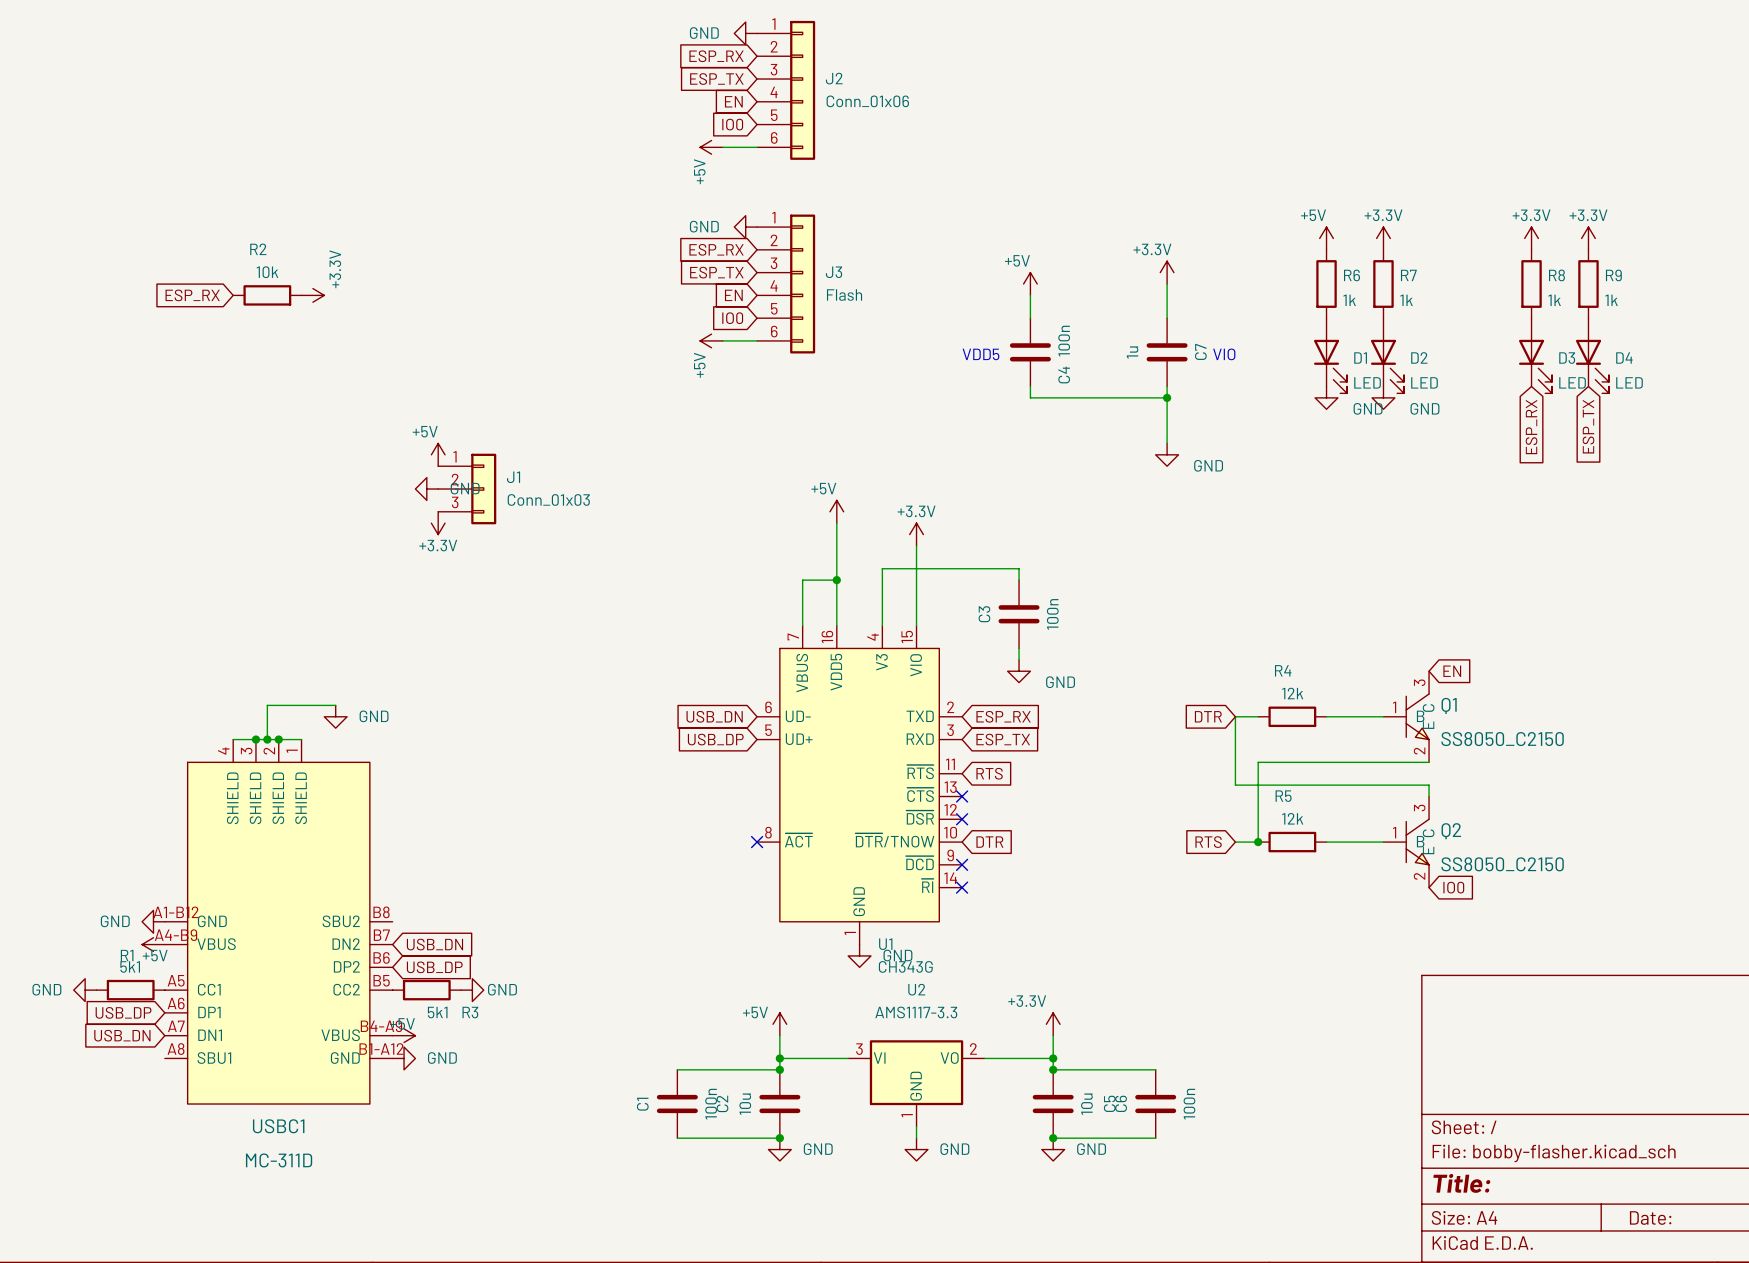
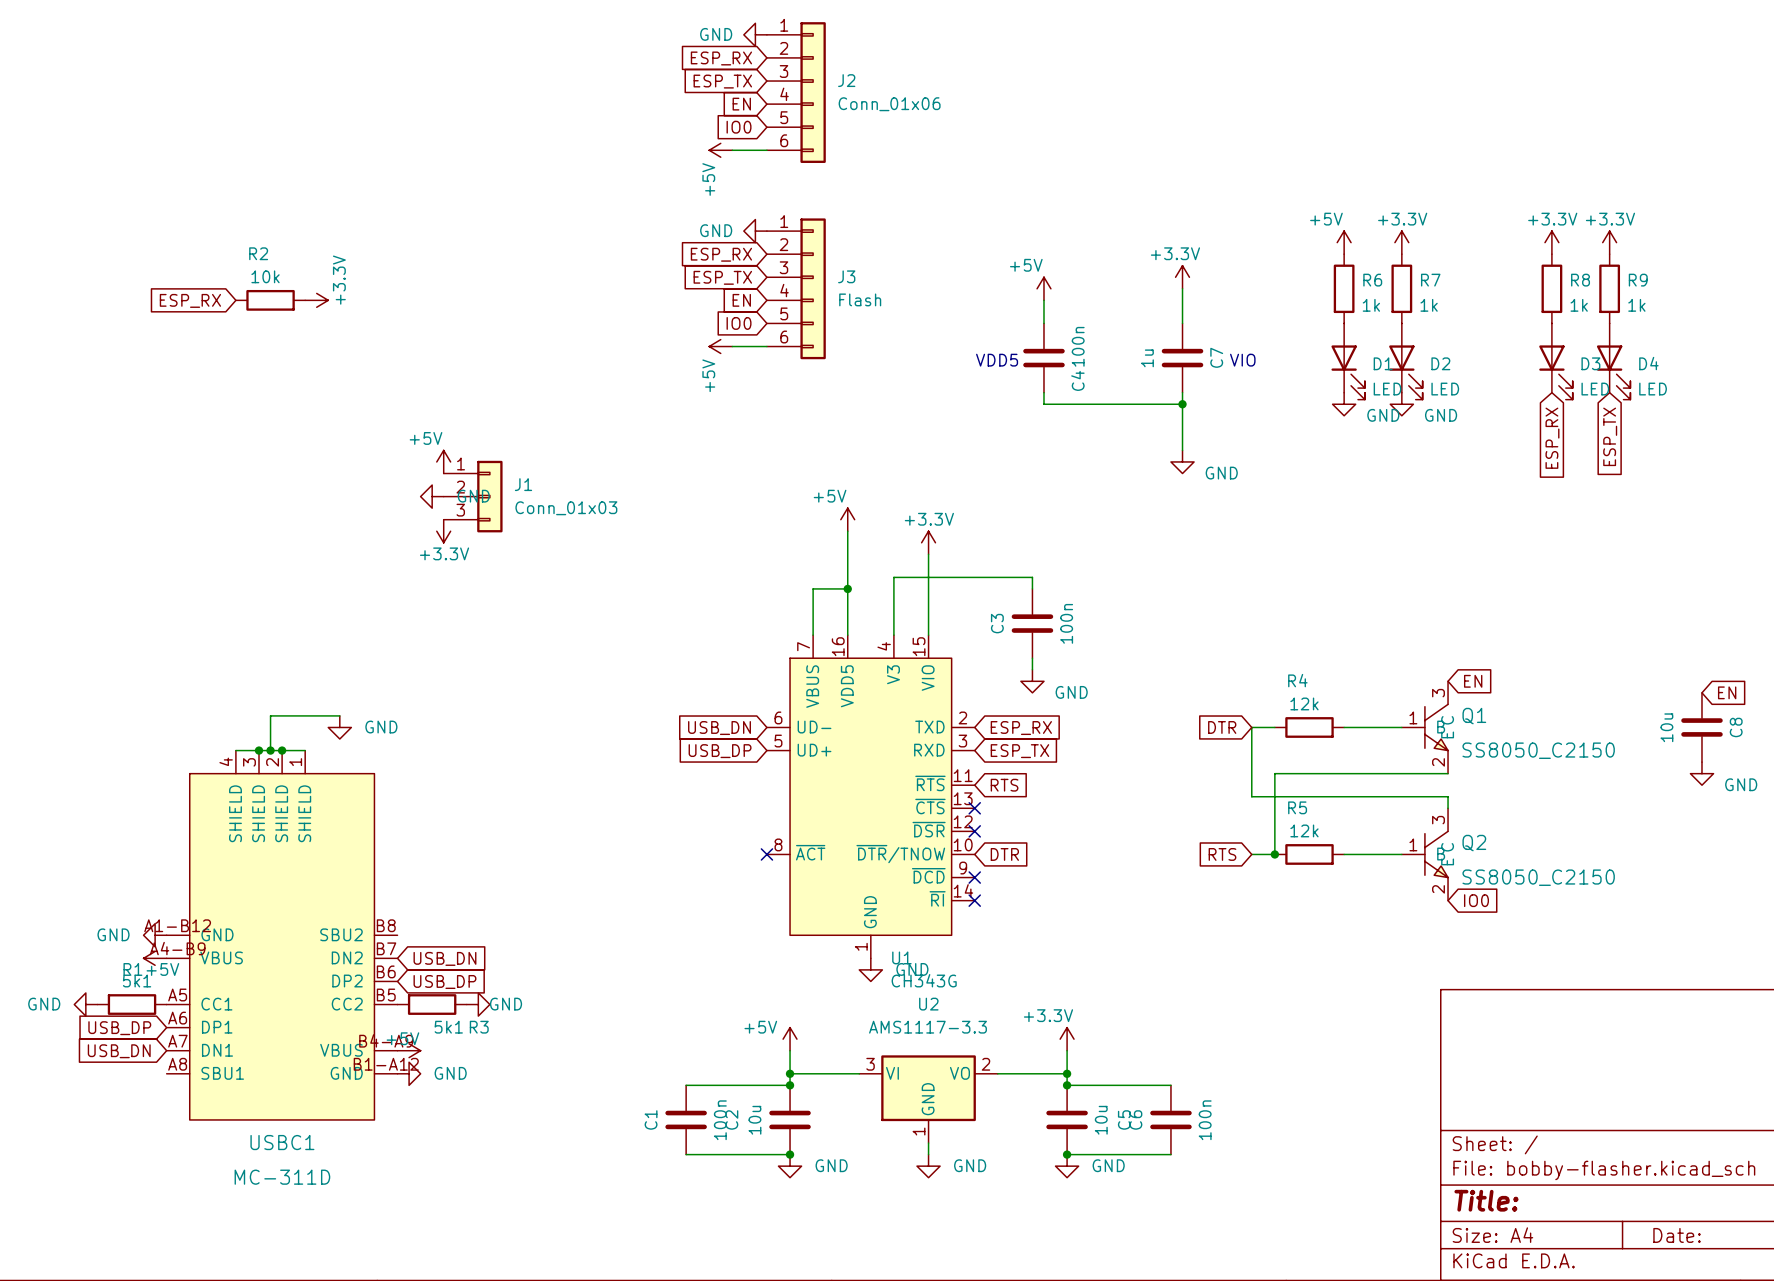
global label: none -> EN (1727, 692)
C8: none -> 10u (1701, 727)
power symbol: none -> GND (1701, 773)

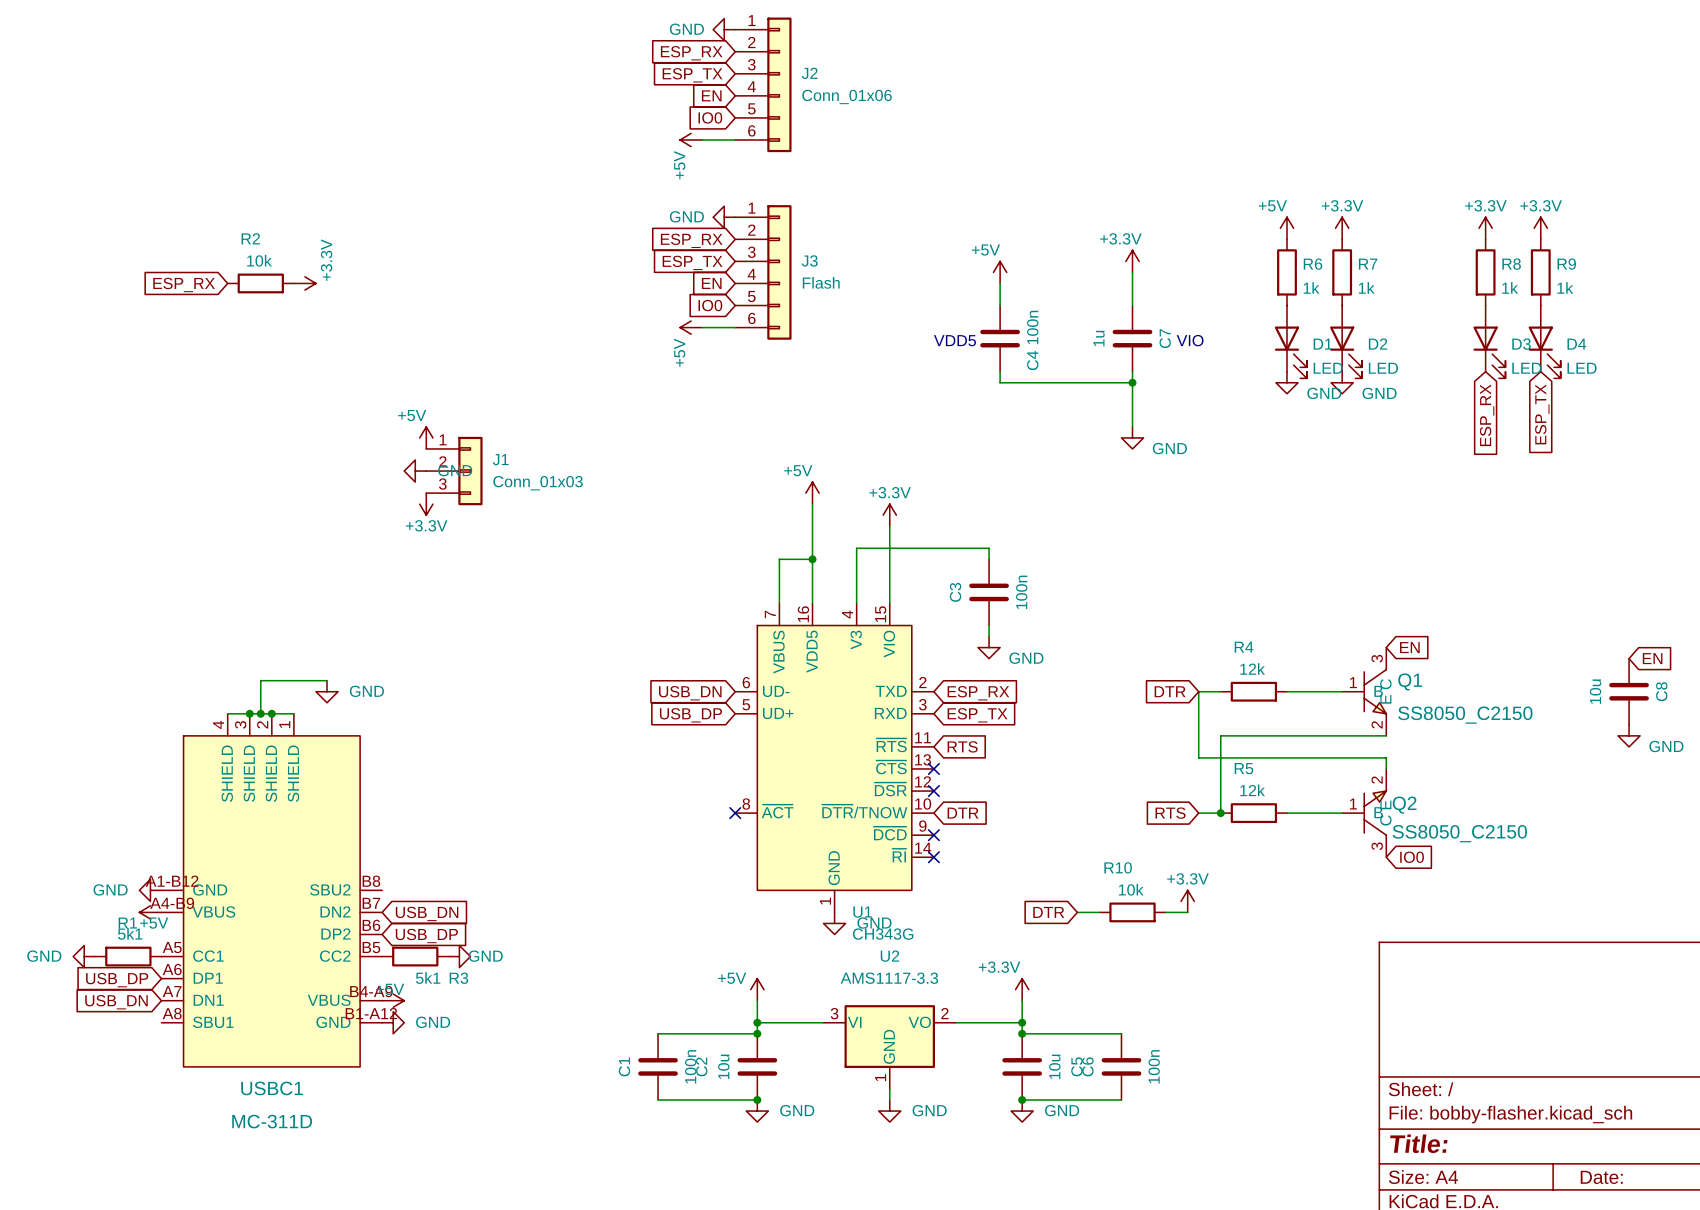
Q2 flip: as is (1436, 854) -> up-down (1375, 813)
power symbol: none -> +3.3V (1187, 901)
global label: none -> DTR (1048, 912)
wire: none -> (1077, 912) (1099, 912)
R10: none -> 10k (1132, 912)
wire: none -> (1165, 912) (1187, 912)

